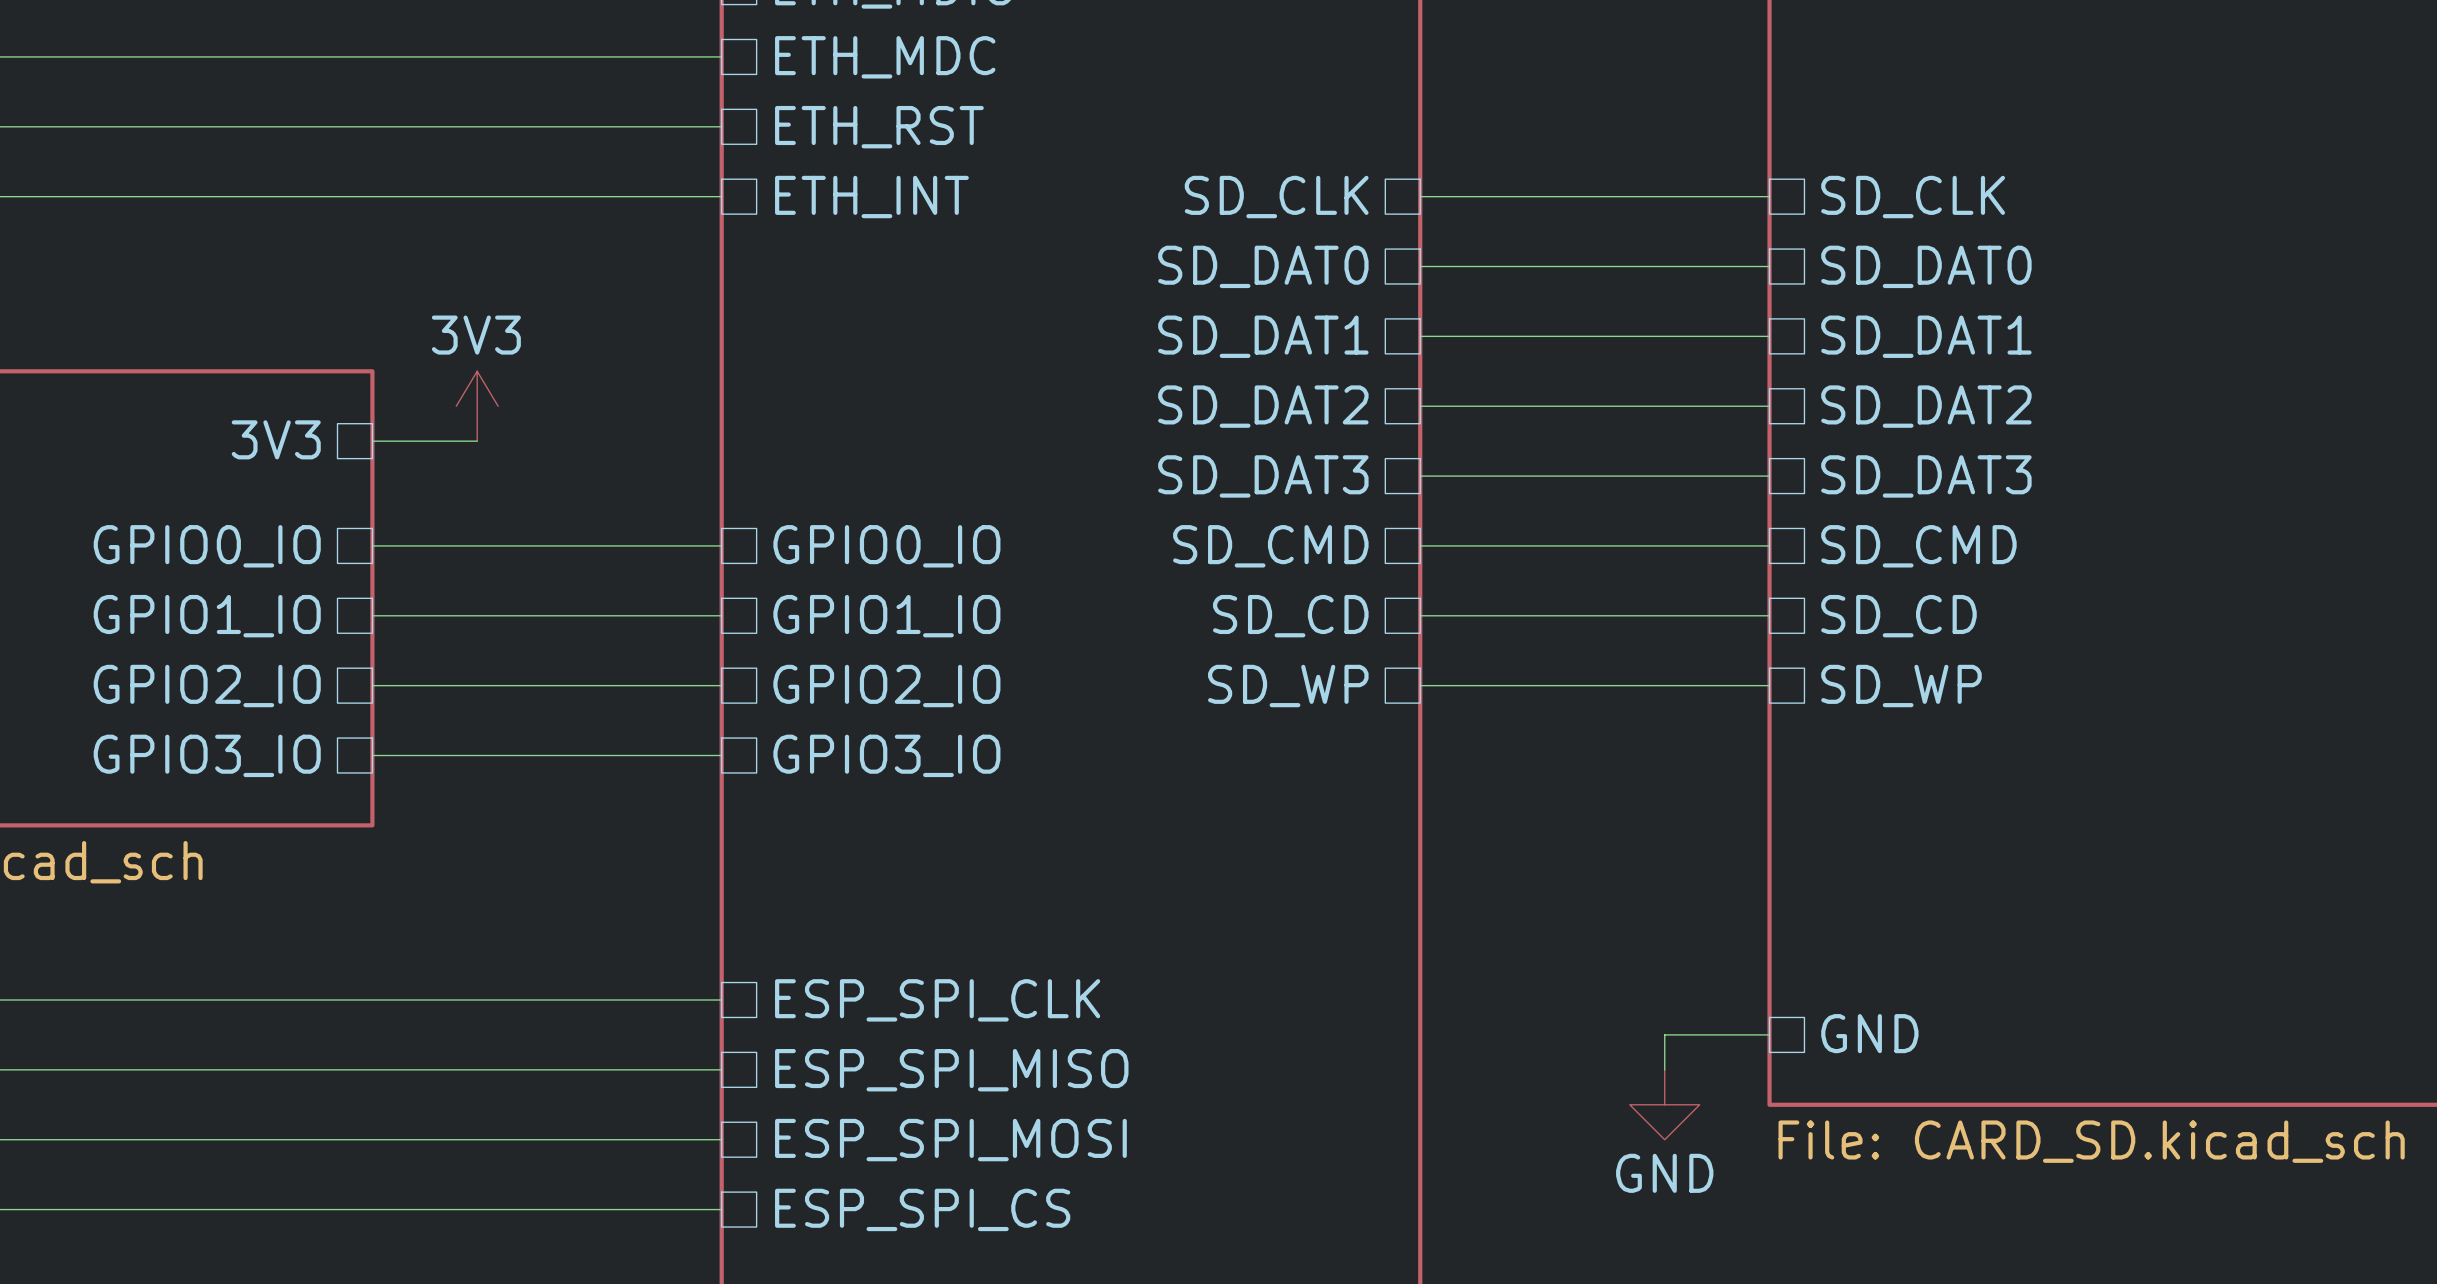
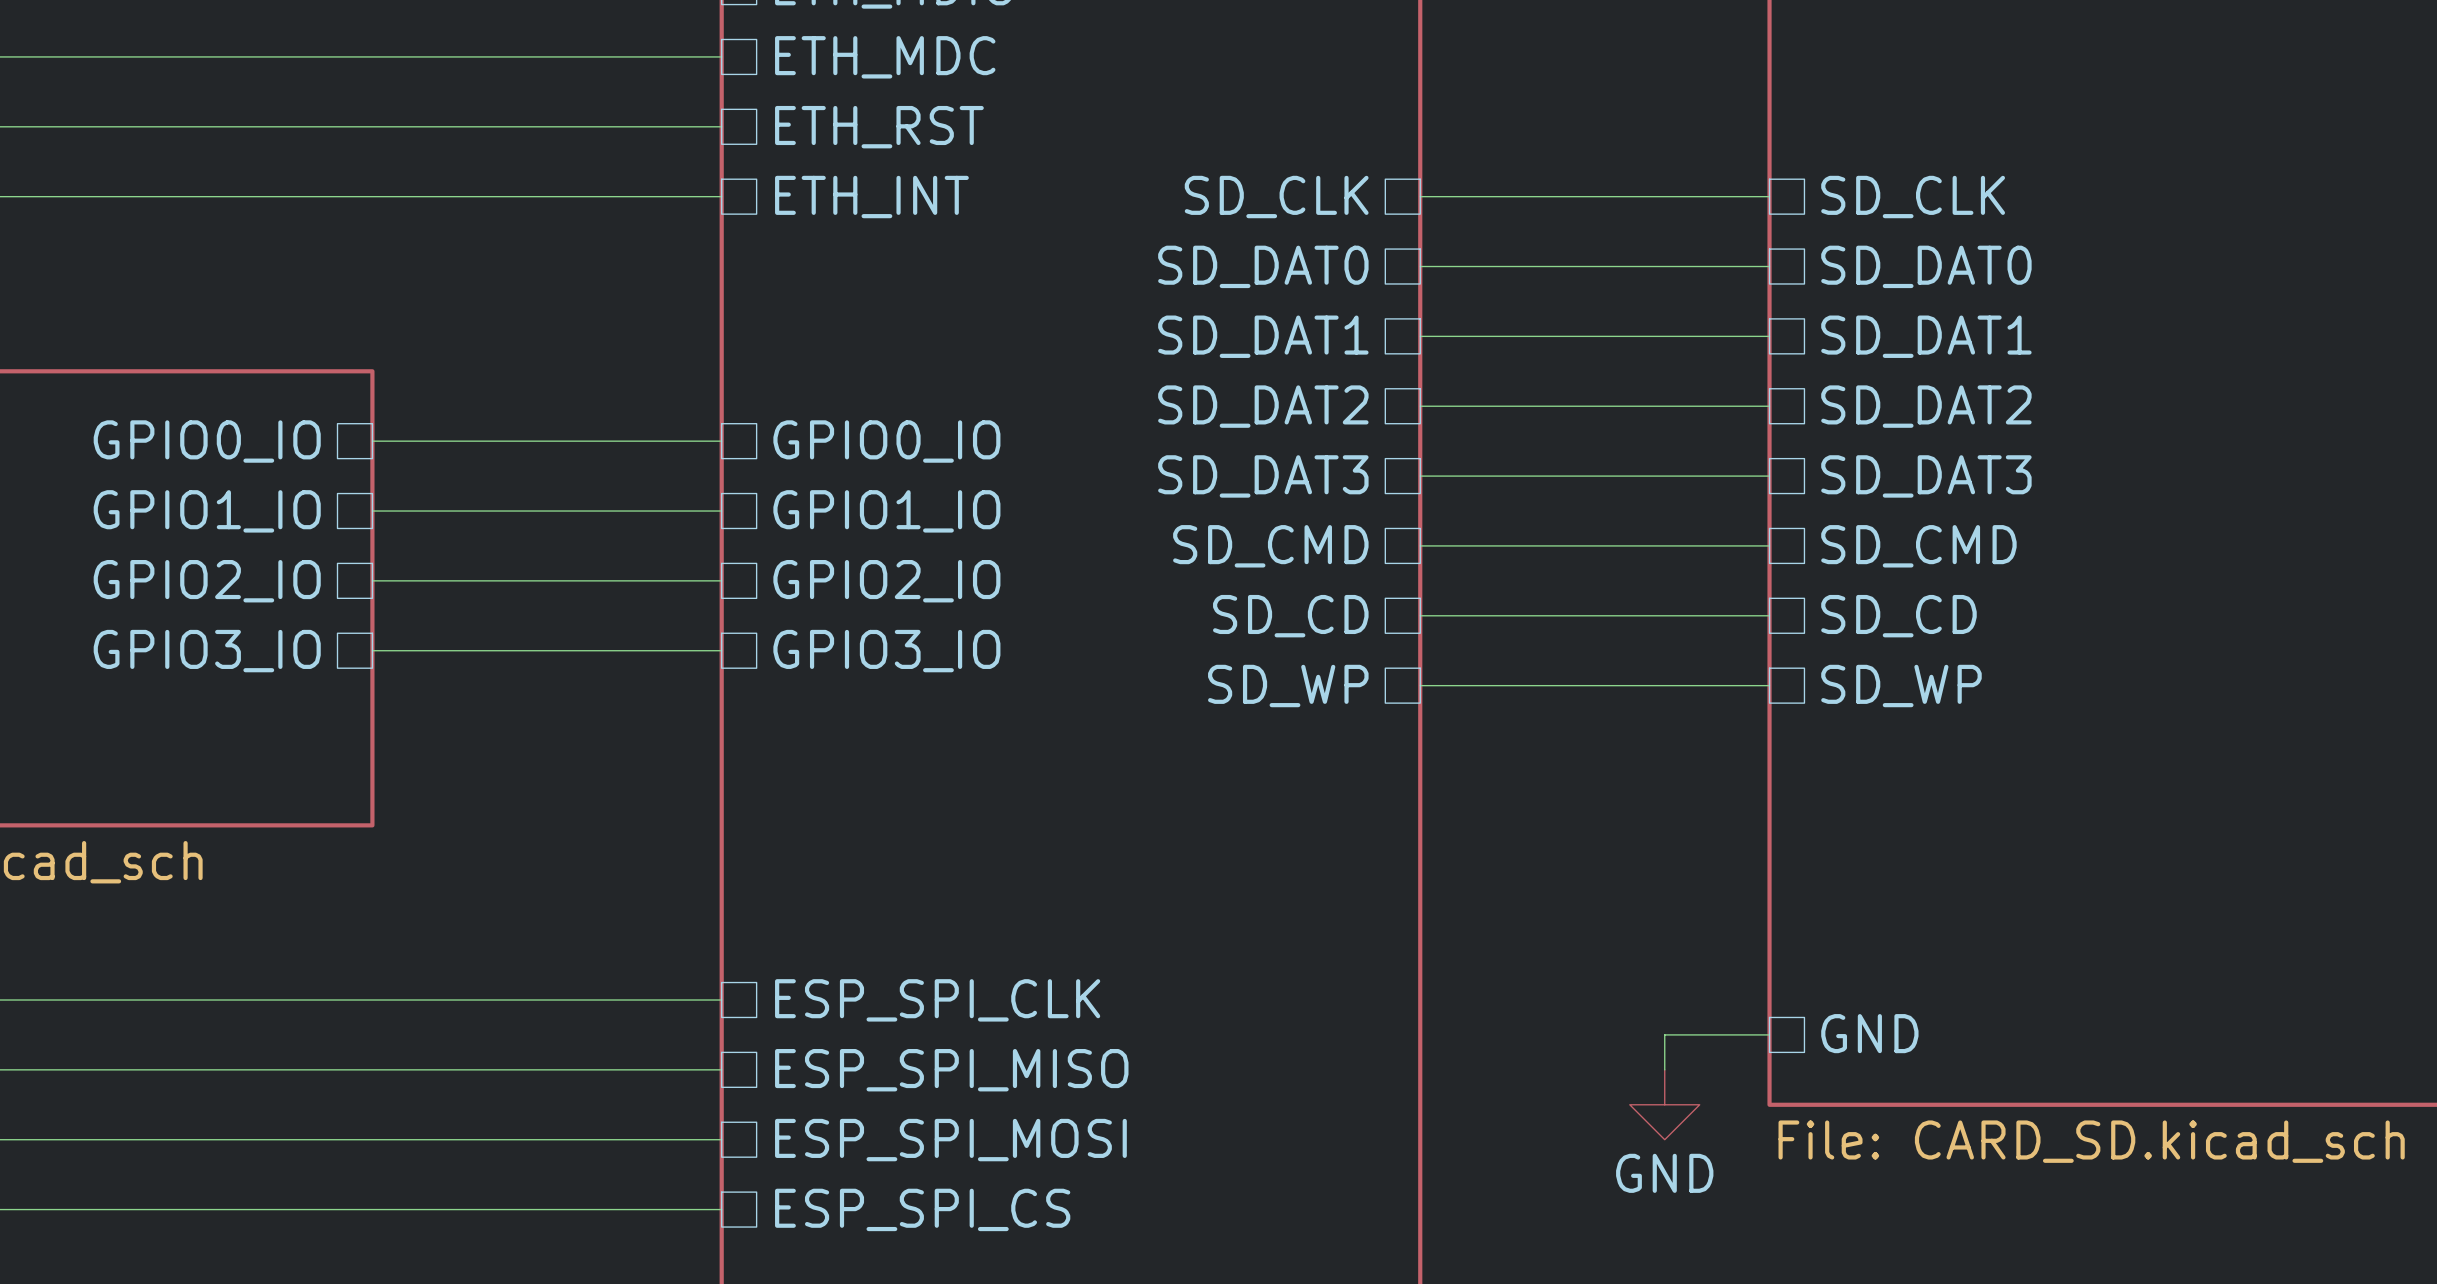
power symbol: 3V3 (477, 406) -> none
sheet pin: 3V3 (276, 439) -> GPIO0_IO (207, 441)
wire: none -> (477, 441) (721, 441)
wire: (372, 545) (721, 545) -> (372, 511) (721, 511)
sheet pin: GPIO0_IO (207, 546) -> none
sheet pin position: GPIO0_IO (886, 546) -> GPIO0_IO (886, 441)
wire: (372, 615) (721, 615) -> (372, 580) (721, 580)
sheet pin position: GPIO1_IO (207, 616) -> GPIO1_IO (207, 511)
sheet pin position: GPIO1_IO (886, 616) -> GPIO1_IO (886, 511)
wire: (372, 685) (721, 685) -> (372, 650) (721, 650)
sheet pin position: GPIO2_IO (207, 686) -> GPIO2_IO (207, 581)
sheet pin position: GPIO2_IO (886, 686) -> GPIO2_IO (886, 581)
sheet pin position: GPIO3_IO (207, 755) -> GPIO3_IO (207, 651)
wire: (372, 755) (721, 755) -> none
sheet pin position: GPIO3_IO (886, 755) -> GPIO3_IO (886, 651)

